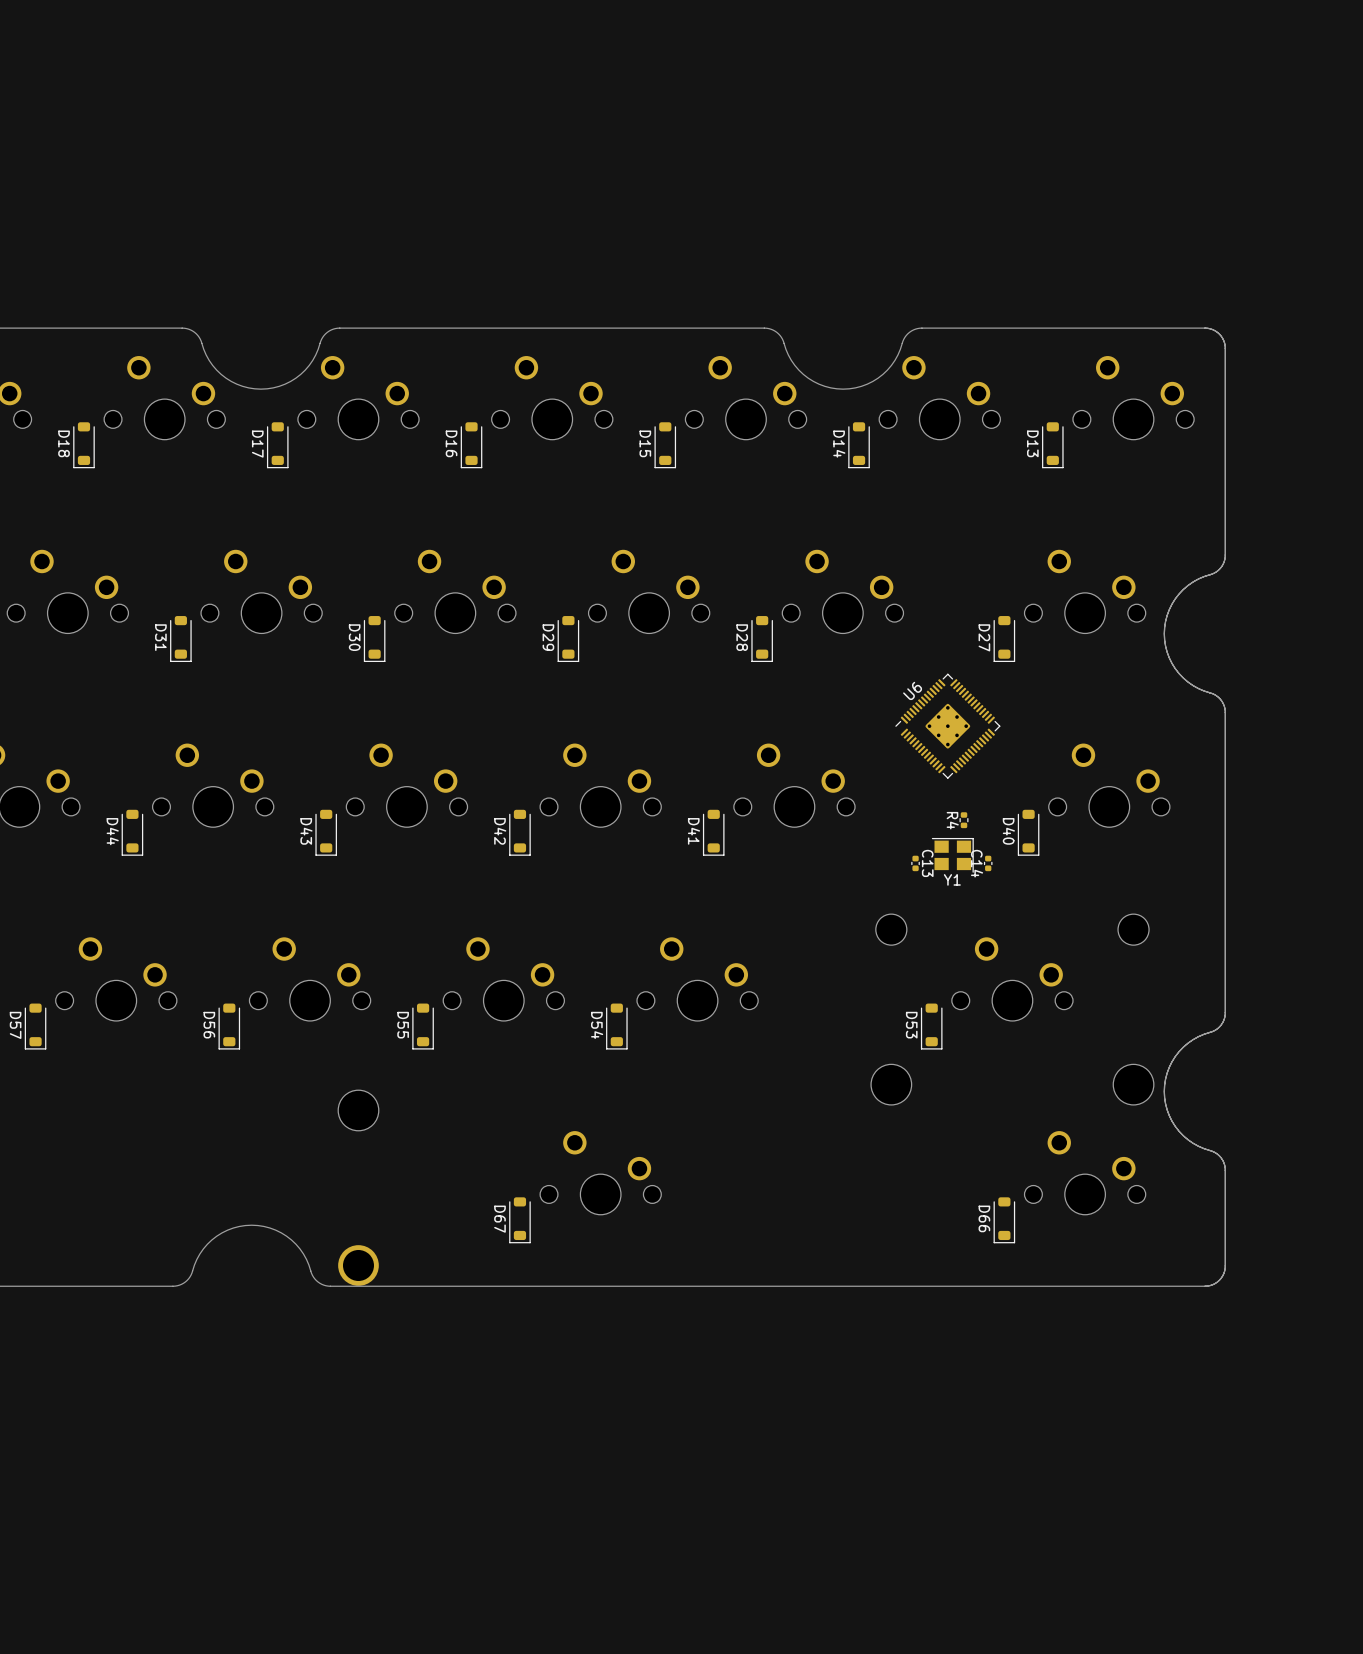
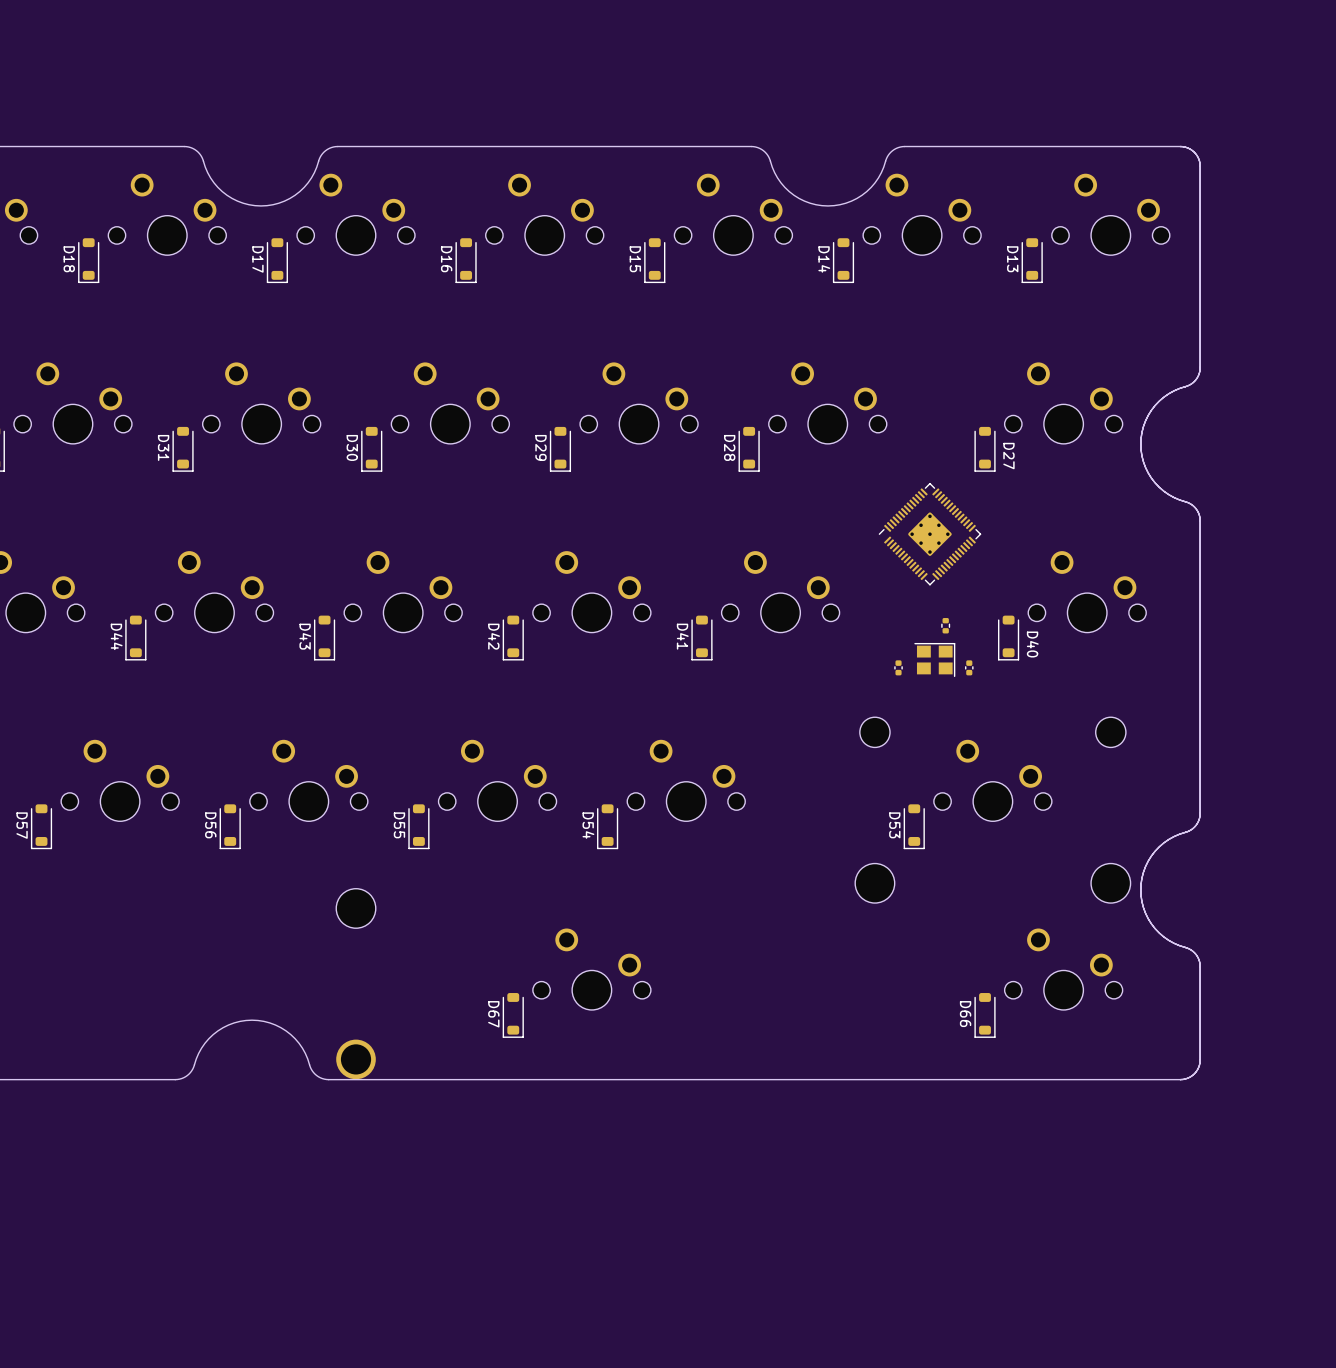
D27 name position: D27 (984, 637) -> D27 (1008, 456)
U6 name: U6 (912, 690) -> none
R4 name: R4 (952, 820) -> none
D40 name position: D40 (1008, 831) -> D40 (1032, 644)
C13 name: C13 (927, 863) -> none
C14 name: C14 (977, 863) -> none
Y1 name: Y1 (952, 879) -> none

